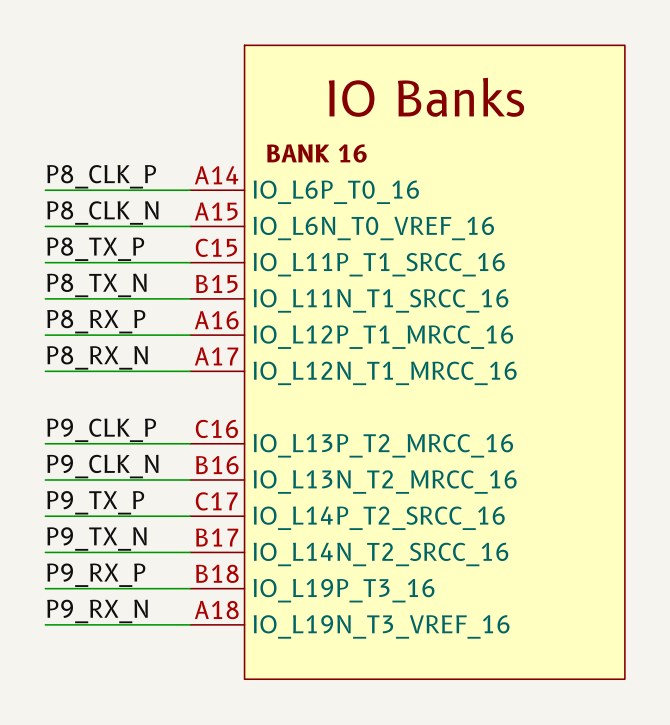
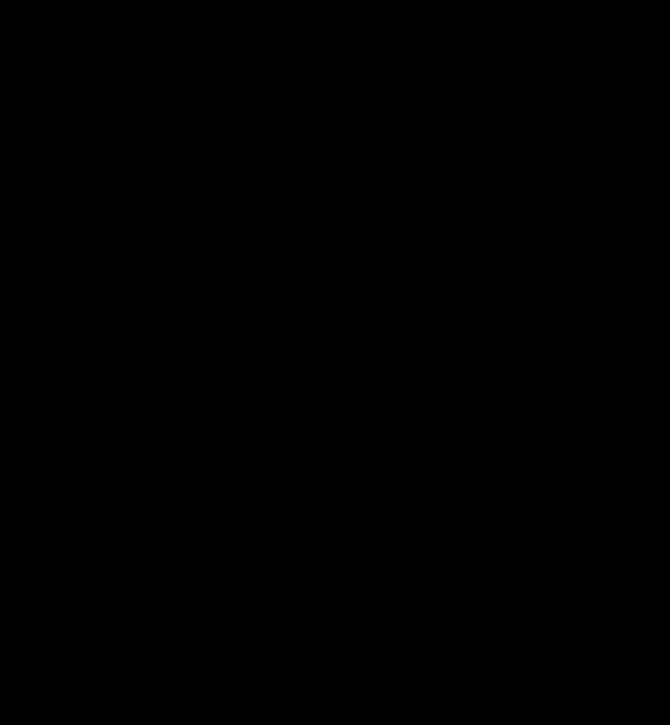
label: P8_CLK_P (101, 176) -> none
wire: (45, 190) (190, 190) -> none
label: P8_CLK_N (102, 212) -> none
wire: (45, 226) (190, 226) -> none
label: P8_TX_P (95, 249) -> none
wire: (45, 262) (190, 262) -> none
label: P8_TX_N (96, 285) -> none
wire: (45, 298) (190, 298) -> none
label: P8_RX_P (96, 321) -> none
wire: (45, 335) (190, 335) -> none
label: P8_RX_N (97, 357) -> none
part: (407, 362) -> none
wire: (45, 371) (190, 371) -> none
label: P9_CLK_P (101, 430) -> none
wire: (45, 443) (190, 443) -> none
label: P9_CLK_N (102, 466) -> none
wire: (45, 479) (190, 479) -> none
label: P9_TX_P (95, 502) -> none
wire: (45, 516) (190, 516) -> none
label: P9_TX_N (96, 538) -> none
wire: (45, 552) (190, 552) -> none
label: P9_RX_P (96, 575) -> none
wire: (45, 588) (190, 588) -> none
label: P9_RX_N (97, 611) -> none
wire: (45, 624) (190, 624) -> none

